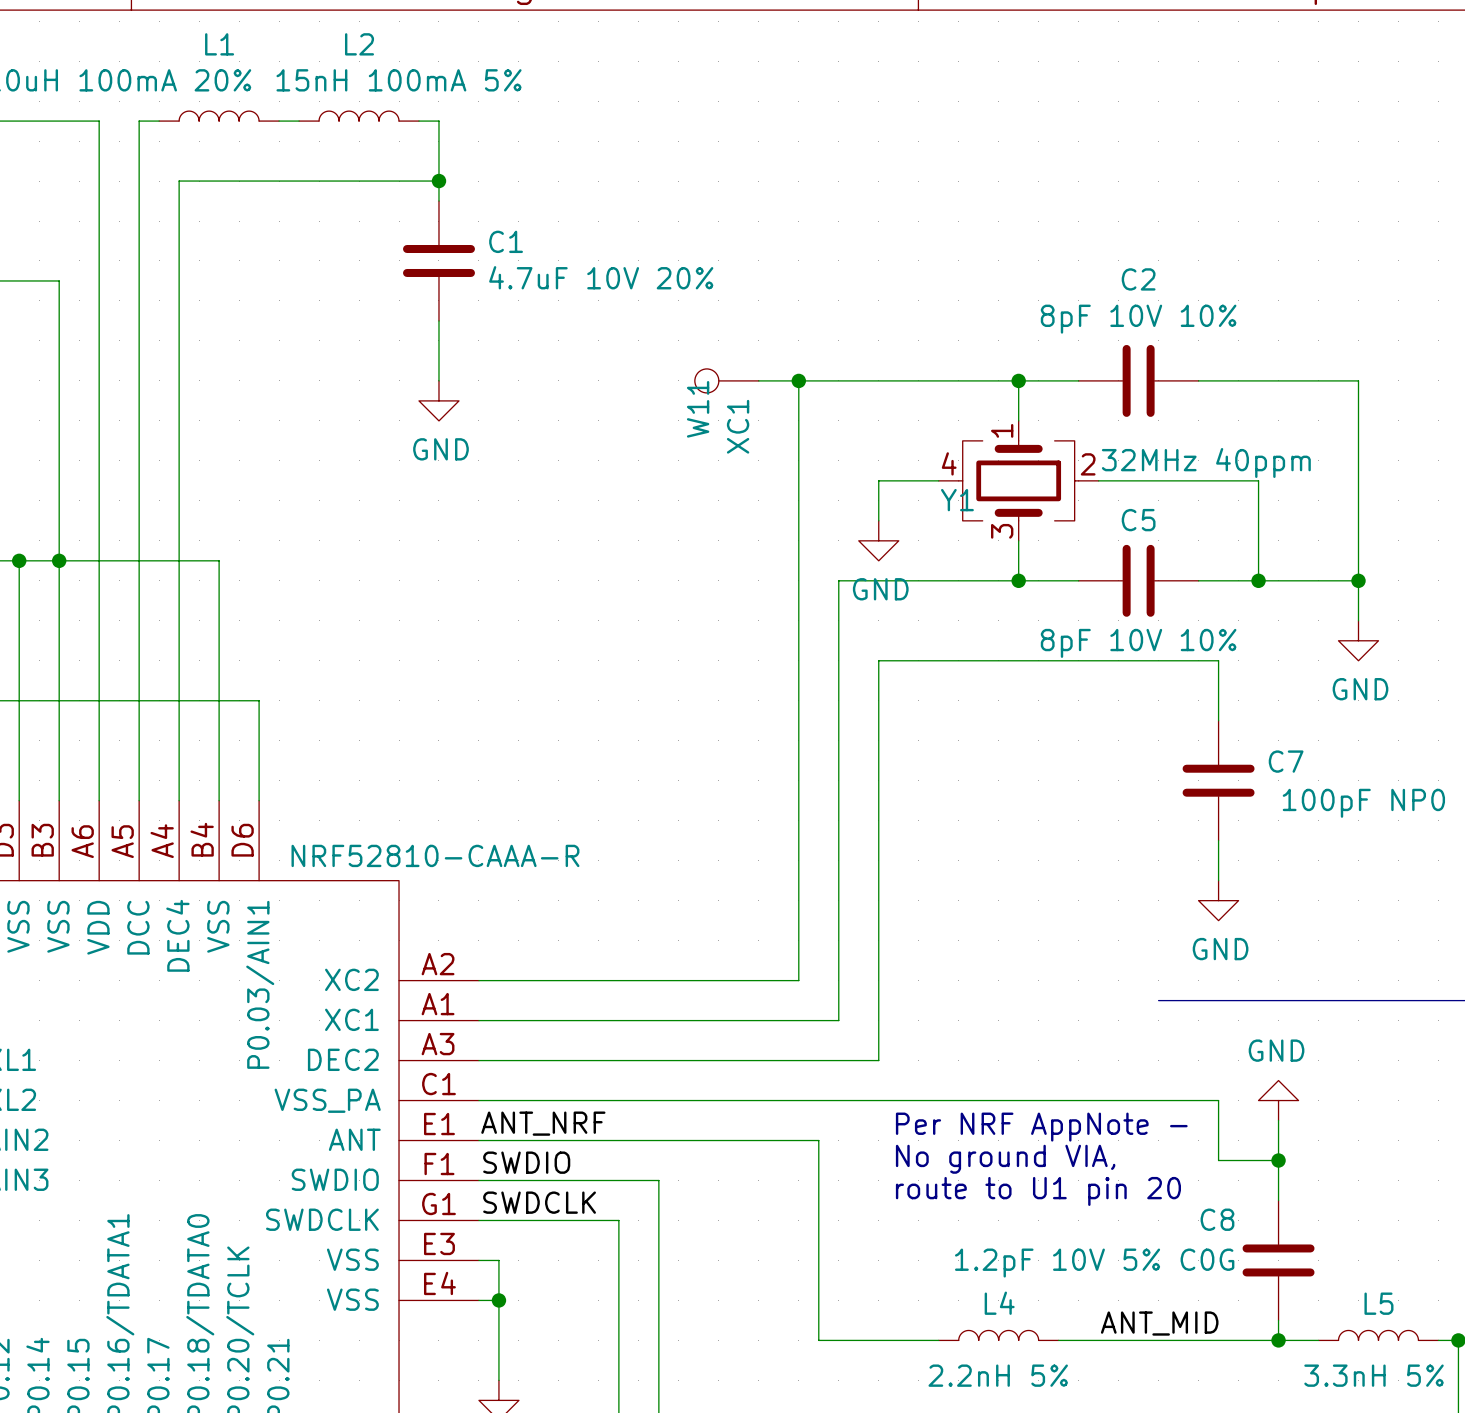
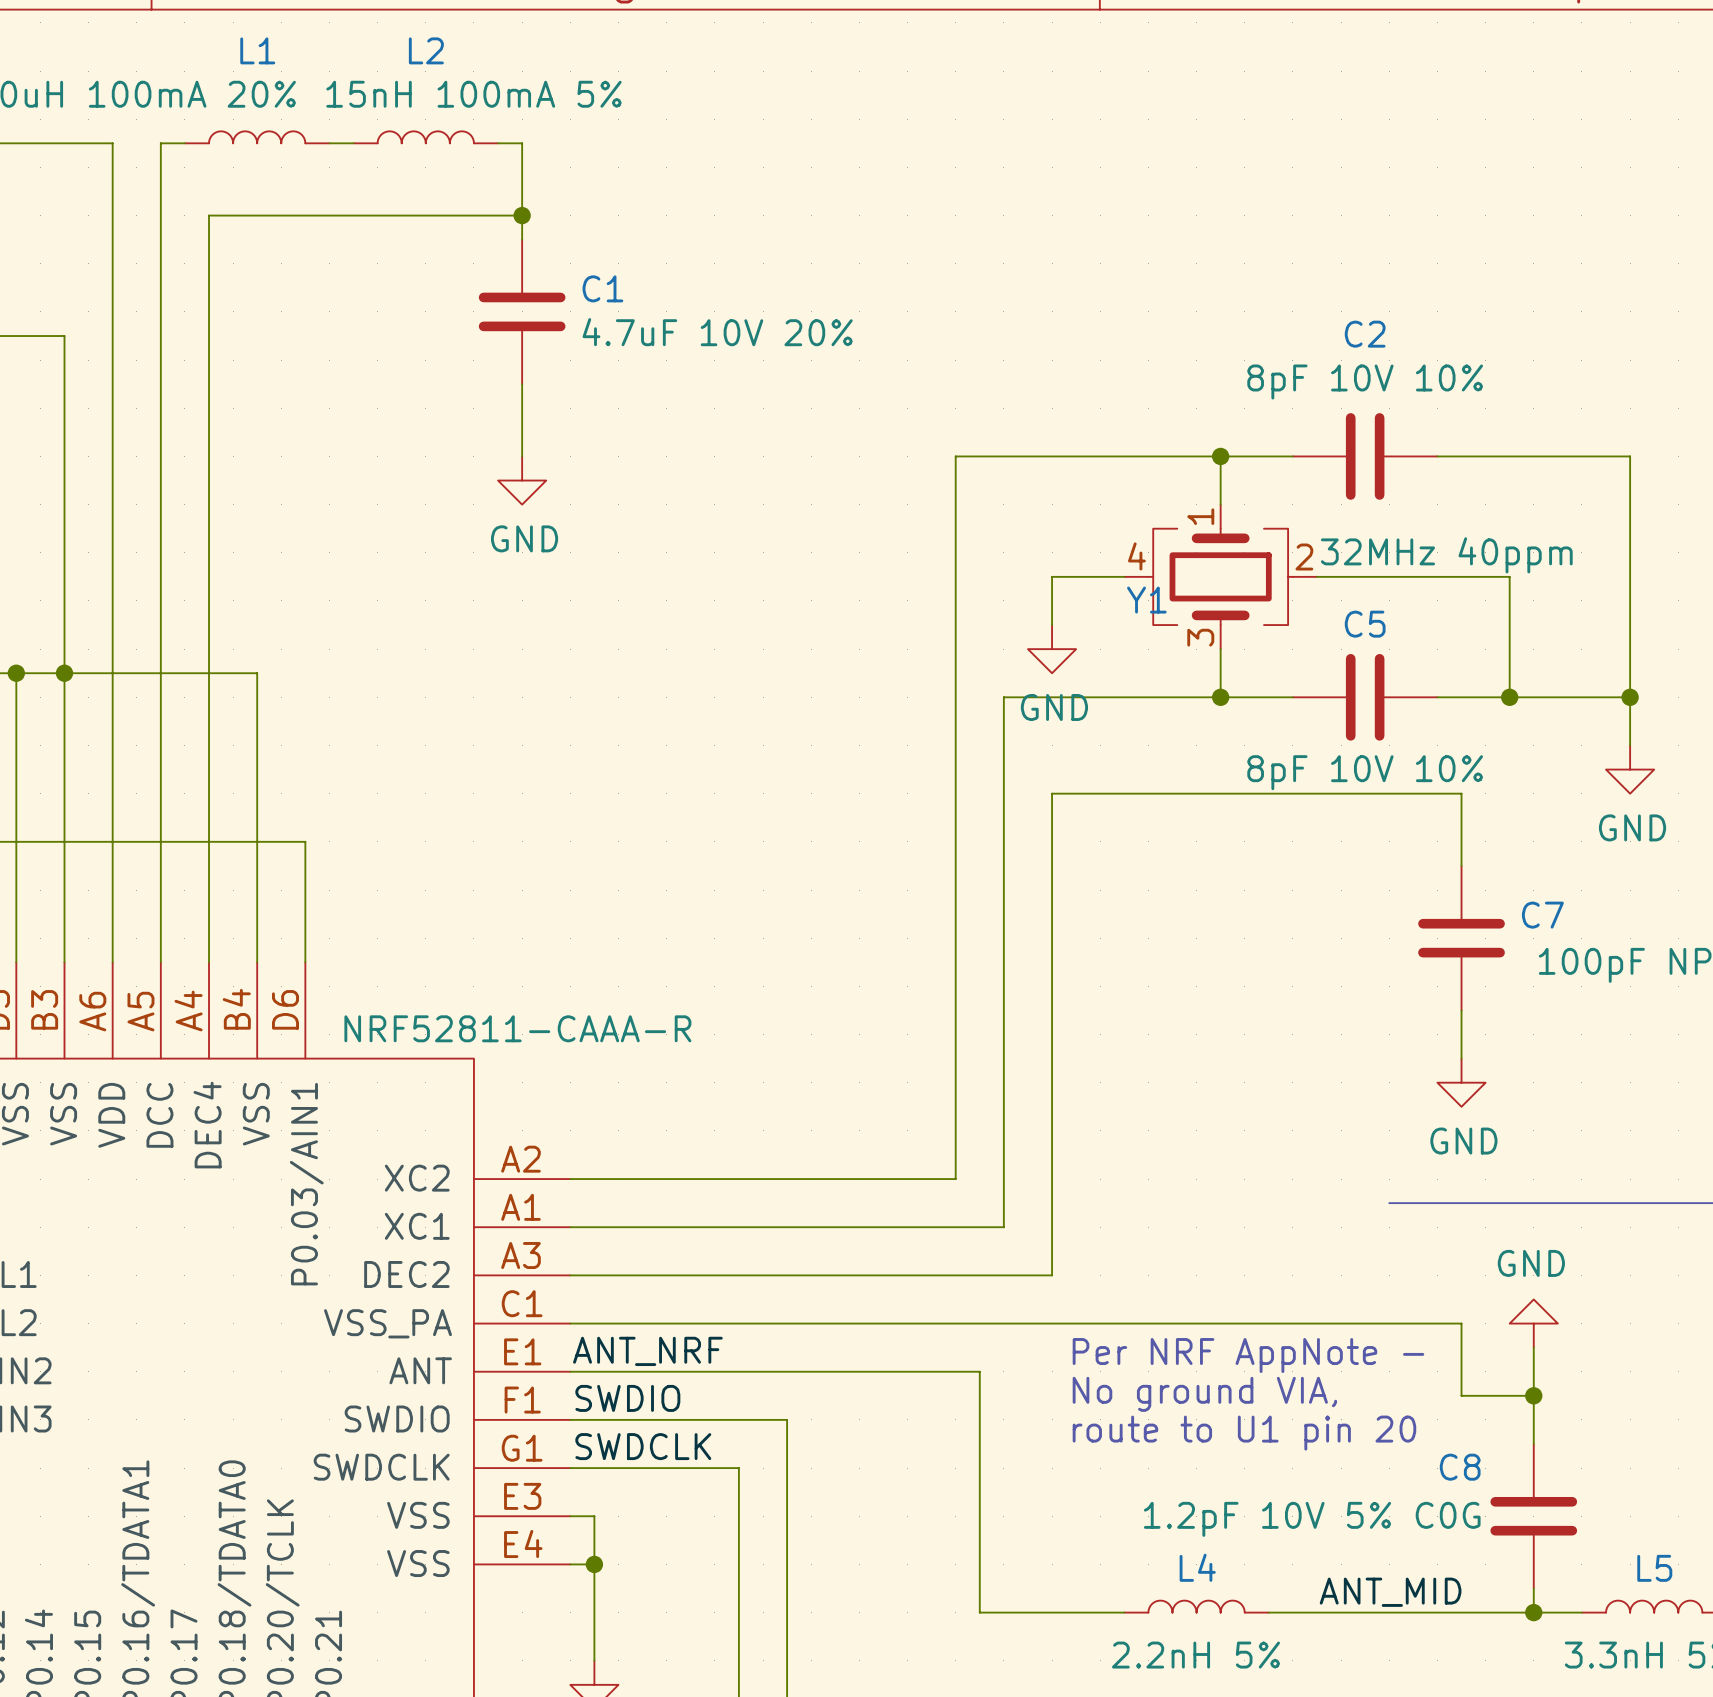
W11: XC1 (726, 380) -> none
wire: (758, 380) (798, 380) -> none
junction: (798, 380) -> none
part value: NRF52810-CAAA-R (435, 855) -> NRF52811-CAAA-R (517, 1028)

